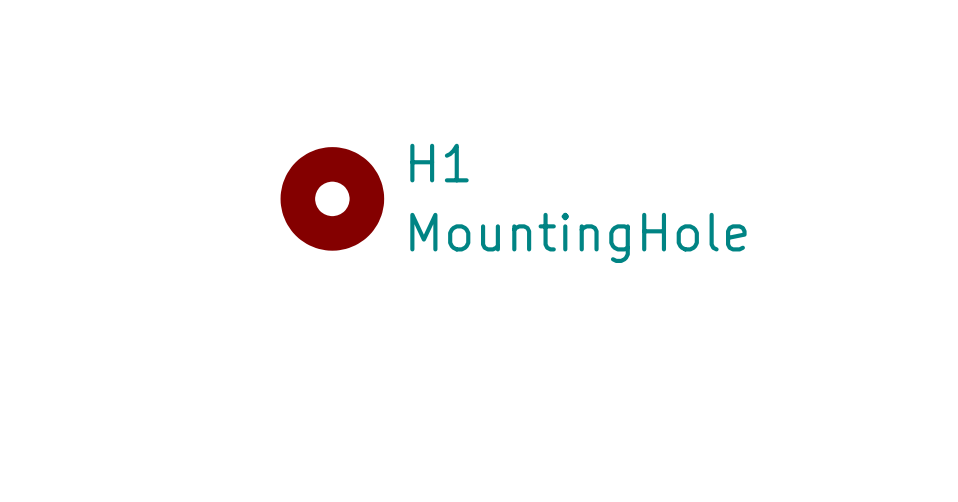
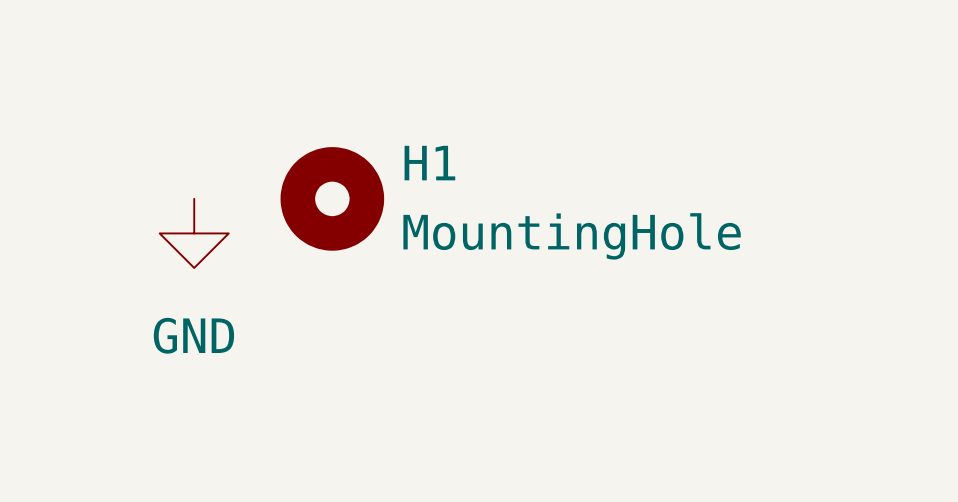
power symbol: none -> GND (194, 233)

